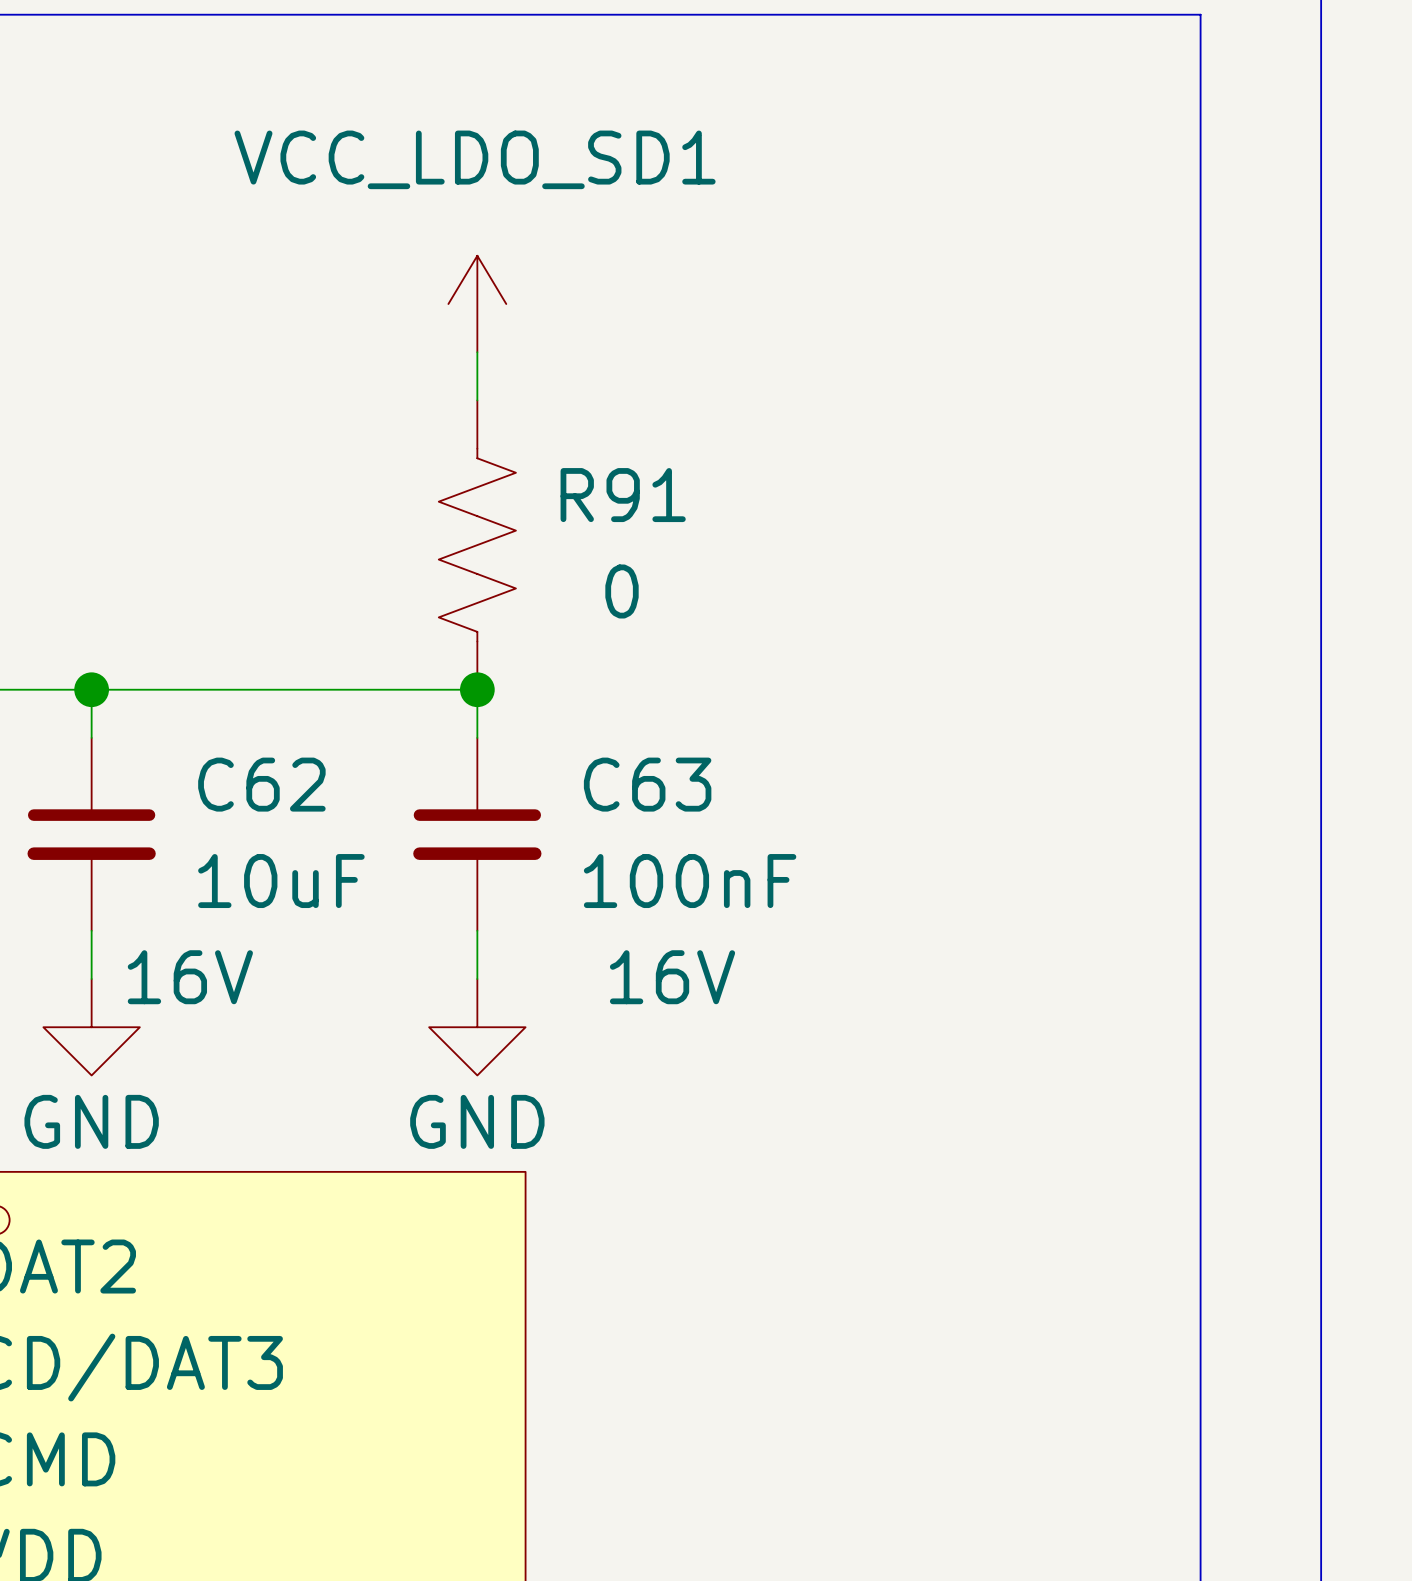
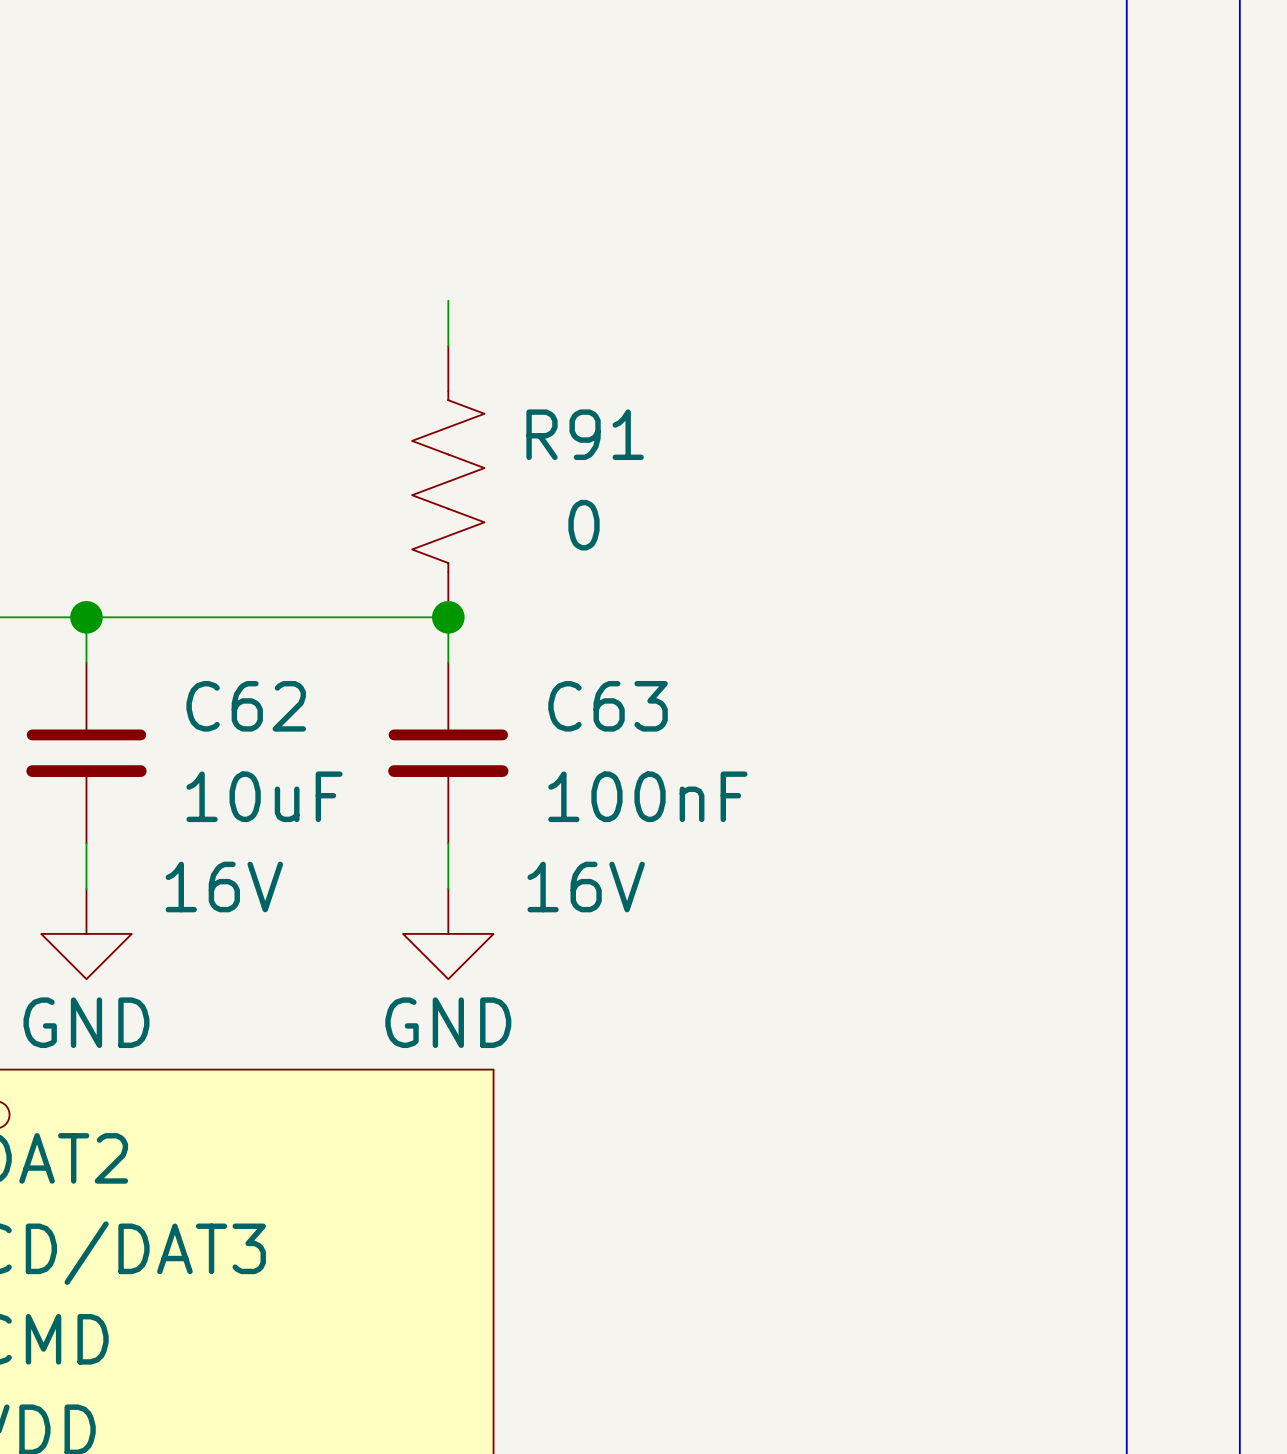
power symbol: VCC_LDO_SD1 (477, 304) -> none
C62 text position: 16V (190, 977) -> 16V (224, 887)
C63 text position: 16V (672, 977) -> 16V (586, 887)

